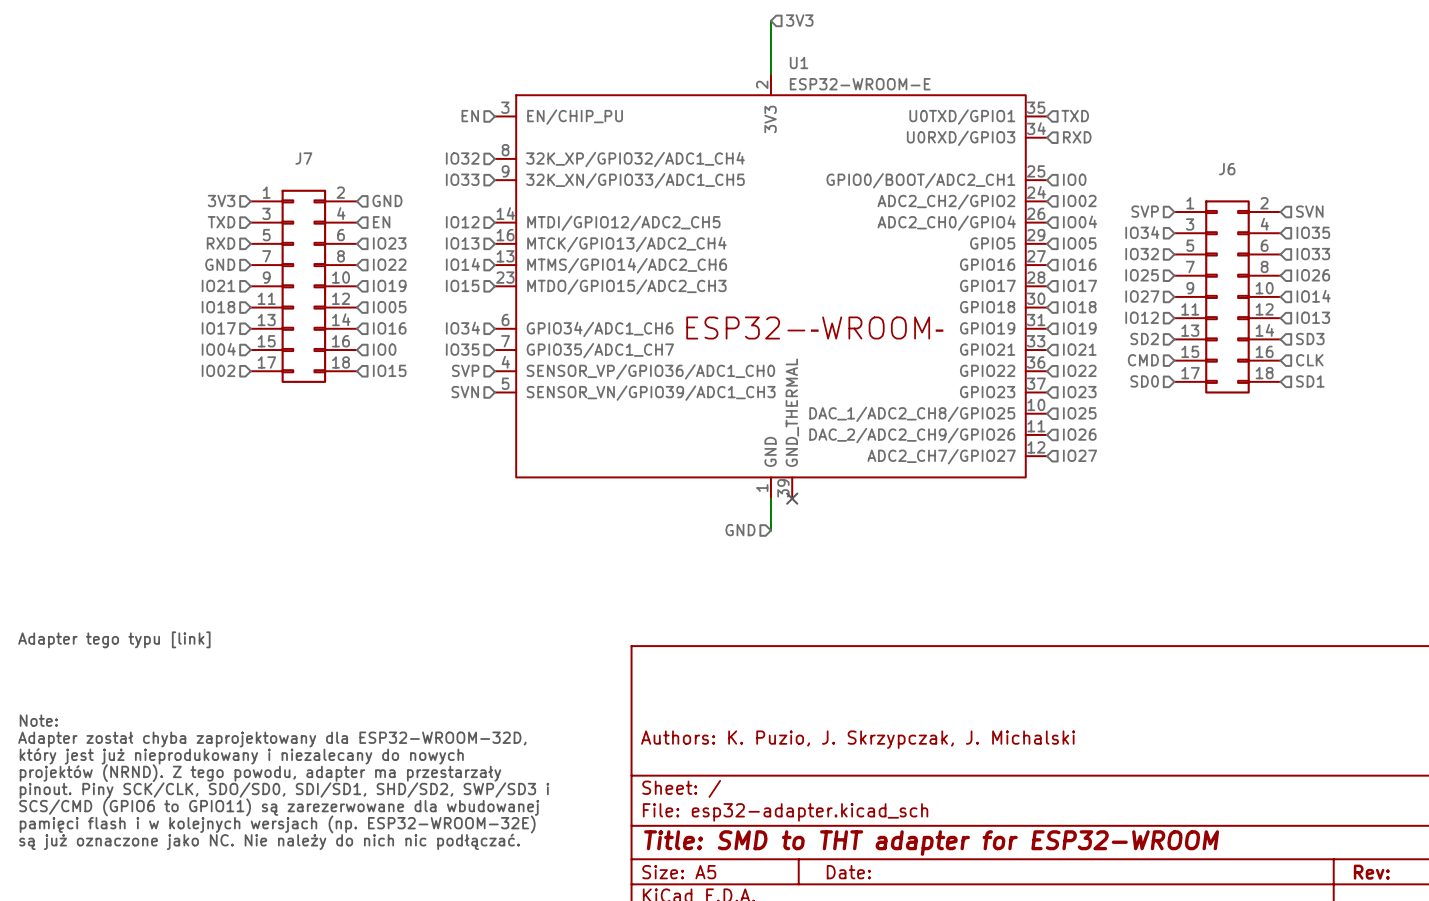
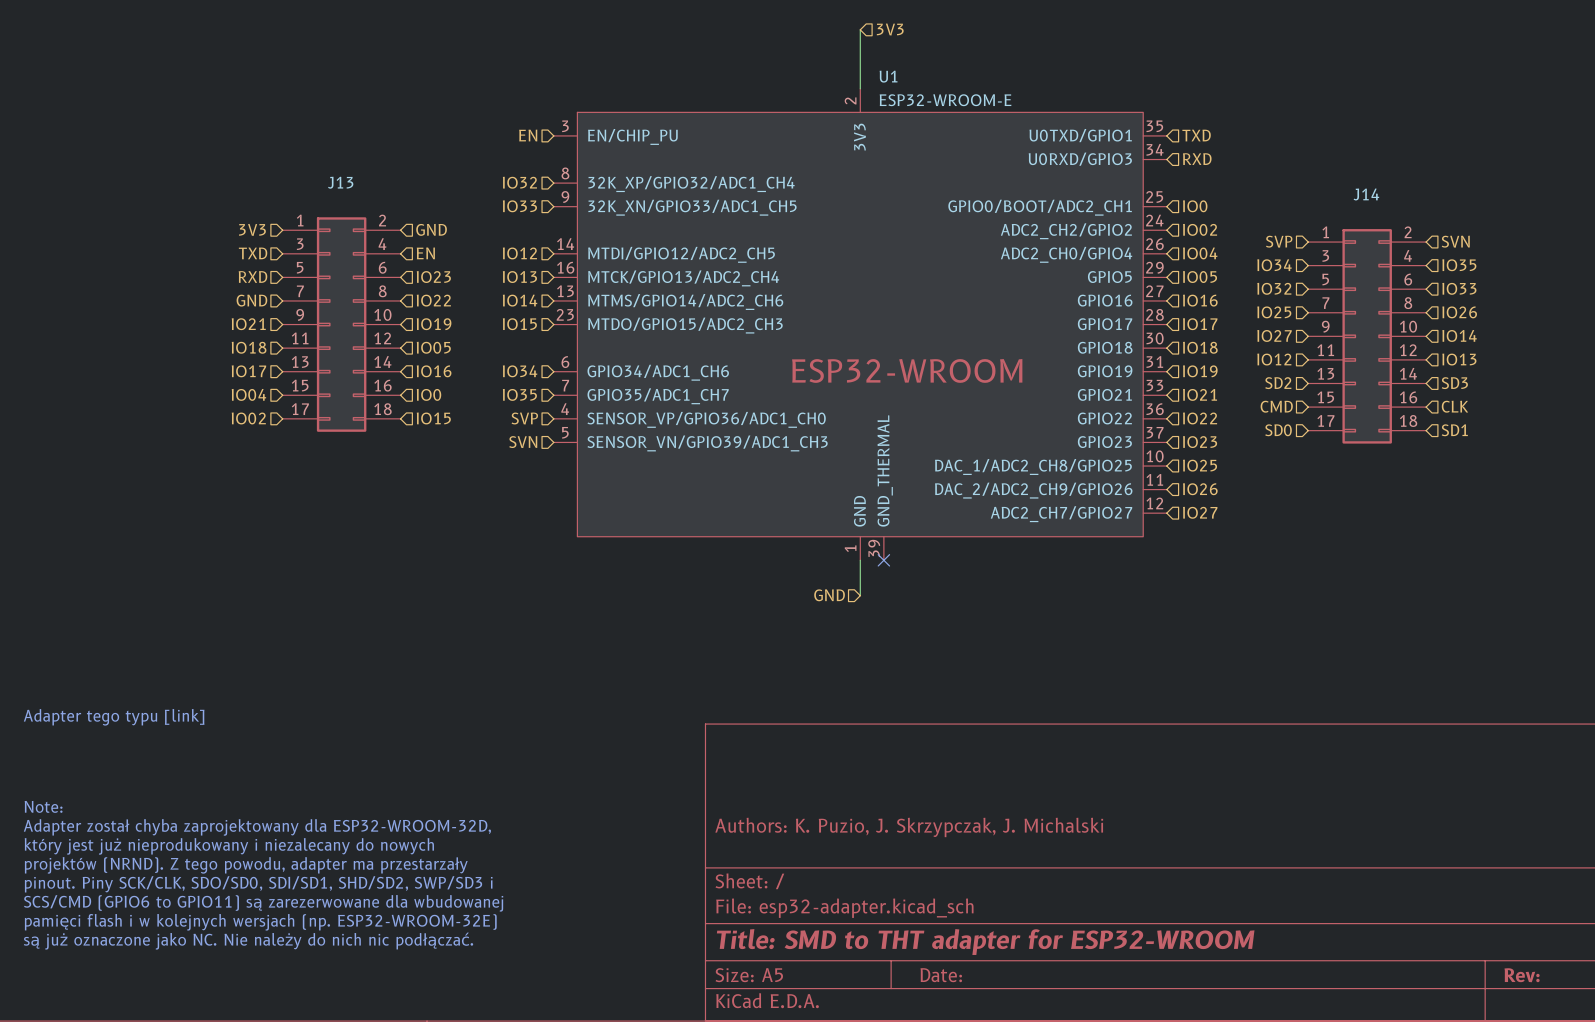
J7 name: J7 (303, 158) -> J13 (340, 182)
J6 name: J6 (1227, 169) -> J14 (1366, 194)

